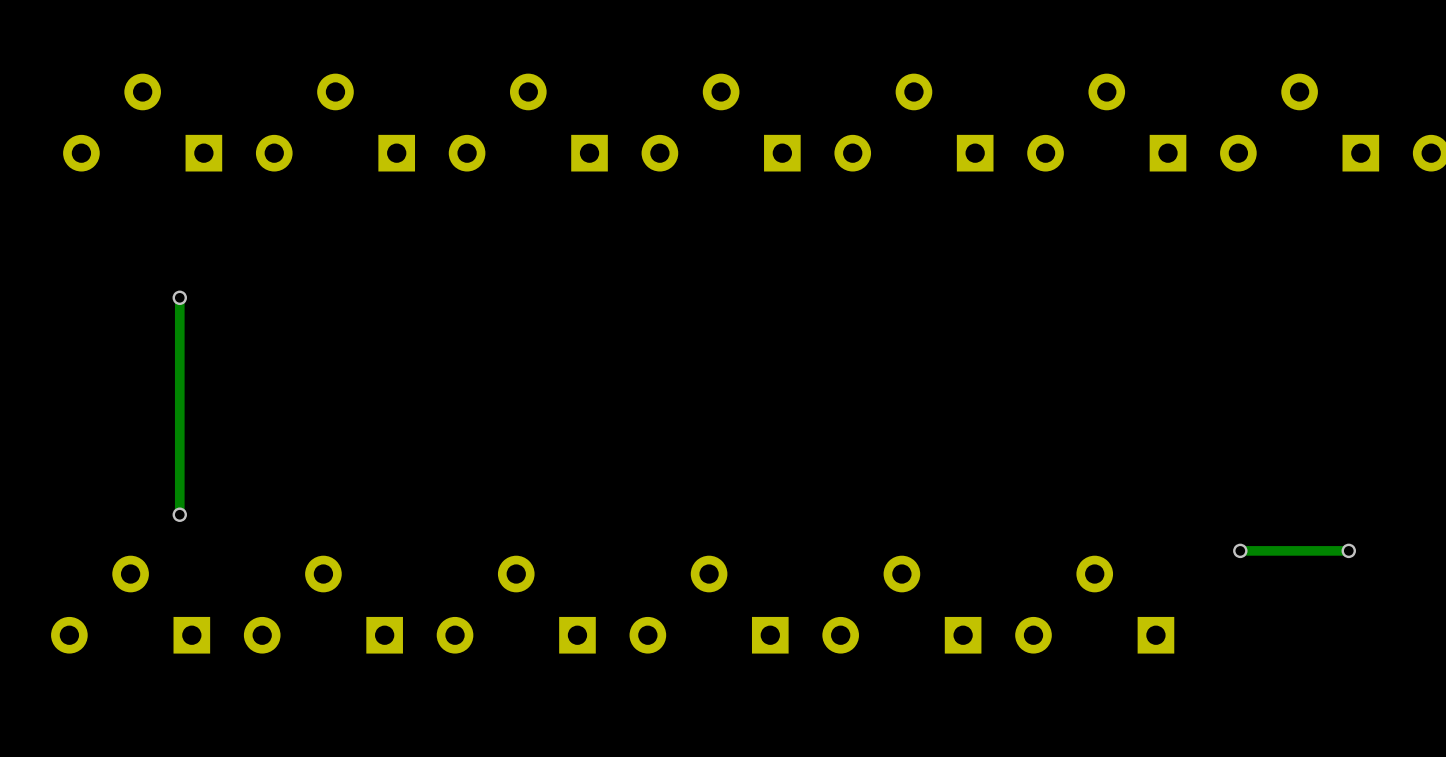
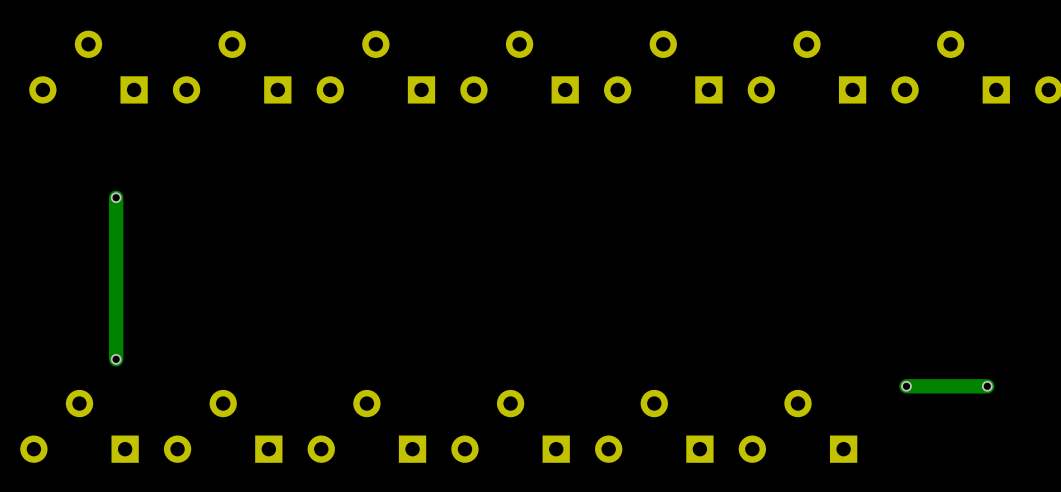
track width: thin (179, 297) (179, 514) -> thick (116, 197) (116, 359)
track width: thin (1348, 550) (1240, 550) -> thick (987, 386) (906, 386)

